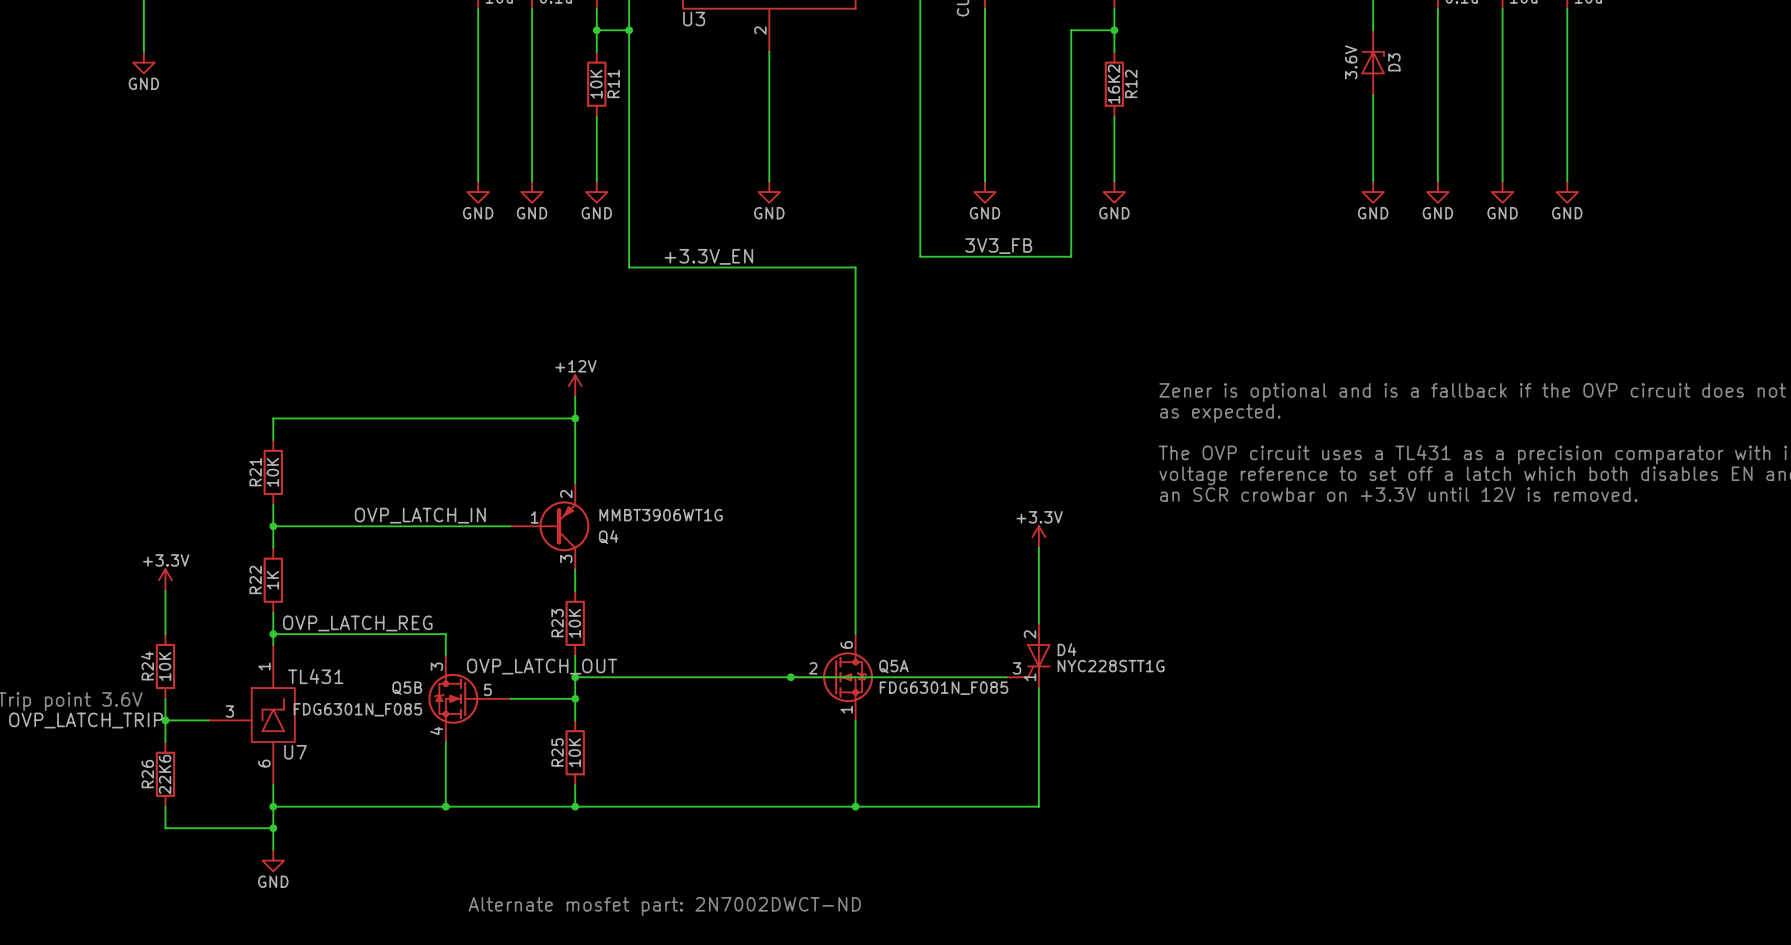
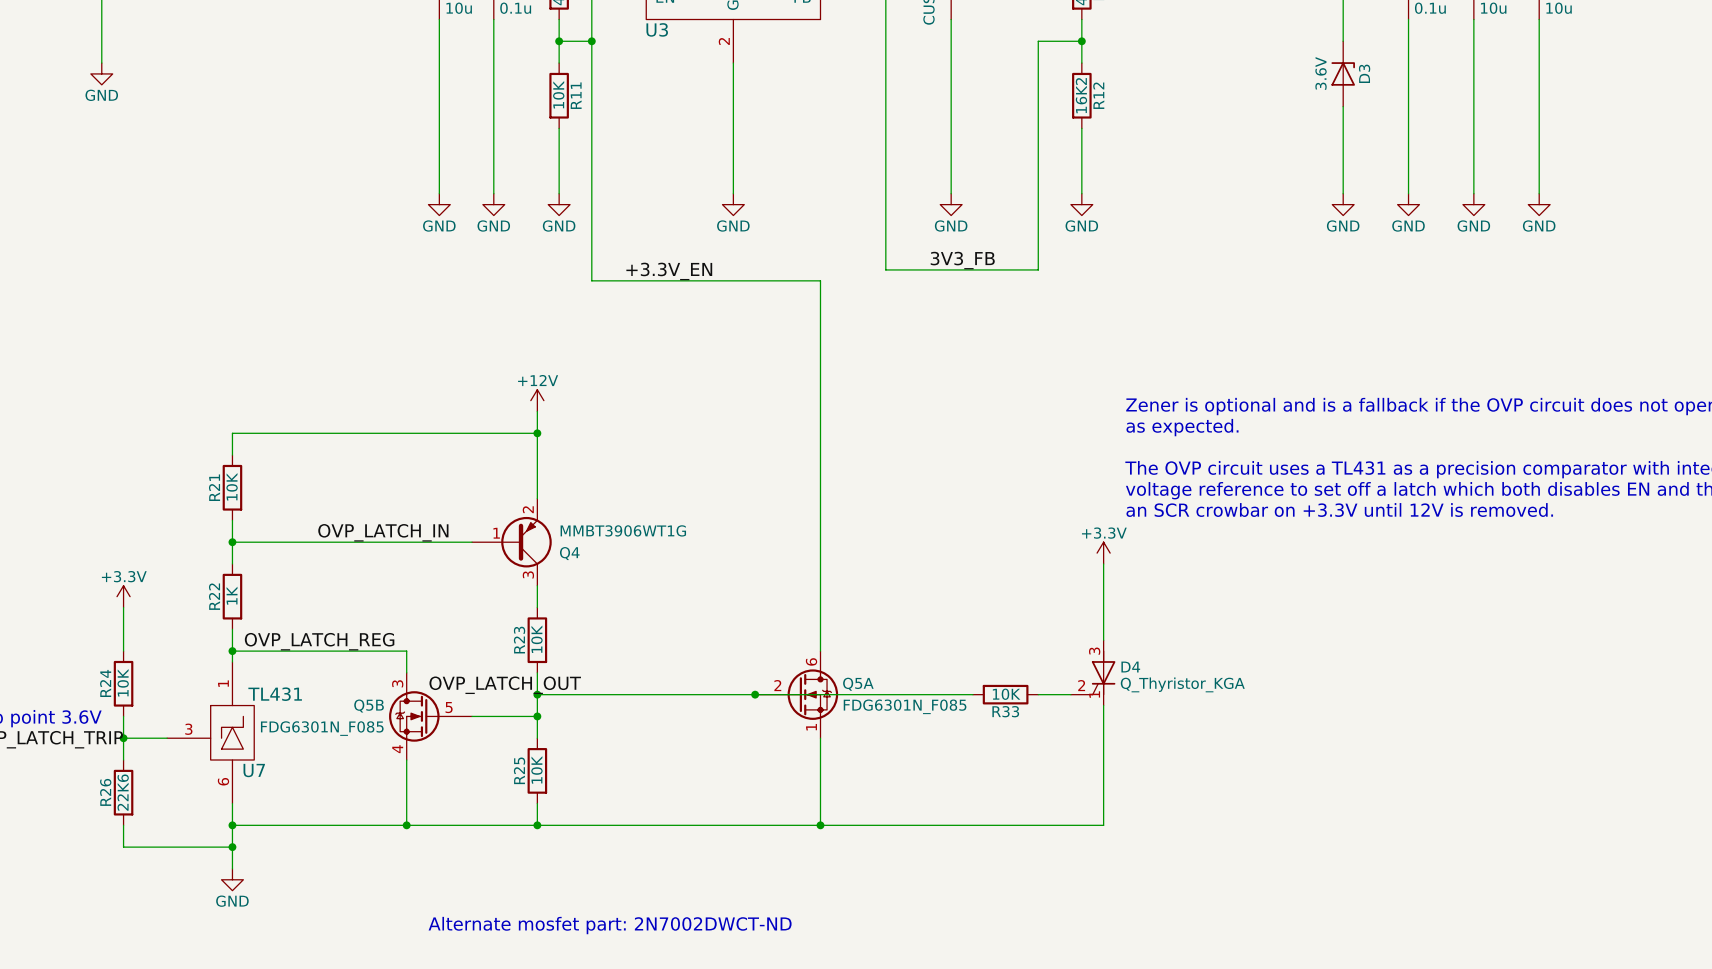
power symbol position: +3.3V (1038, 537) -> +3.3V (1103, 553)
wire: (1038, 547) (1038, 623) -> (1103, 563) (1103, 640)
D4 pin number: 2 (1030, 634) -> 3 (1094, 651)
D4 position: (1028, 655) -> (1093, 672)
D4 value: NYC228STT1G (1111, 666) -> Q_Thyristor_KGA (1182, 684)
D4 pin number: 3 (1017, 668) -> 2 (1081, 685)
R33: none -> 10K (1005, 694)
wire: none -> (1038, 694) (1070, 694)
wire: (1038, 688) (1038, 806) -> (1103, 705) (1103, 825) (1005, 825)

